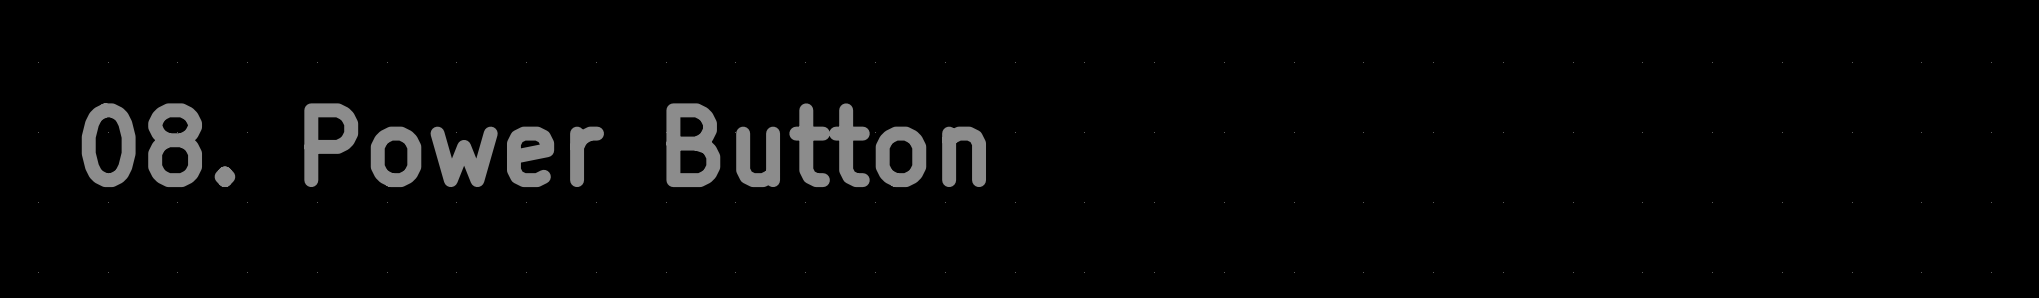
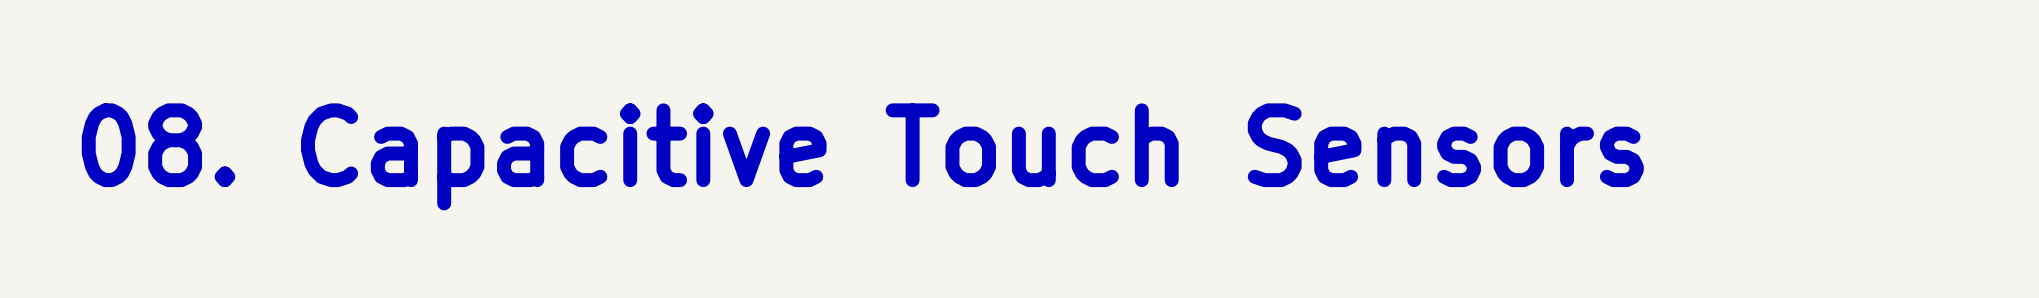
text: 08. Power Button (533, 145) -> 08. Capacitive Touch Sensors (862, 156)

